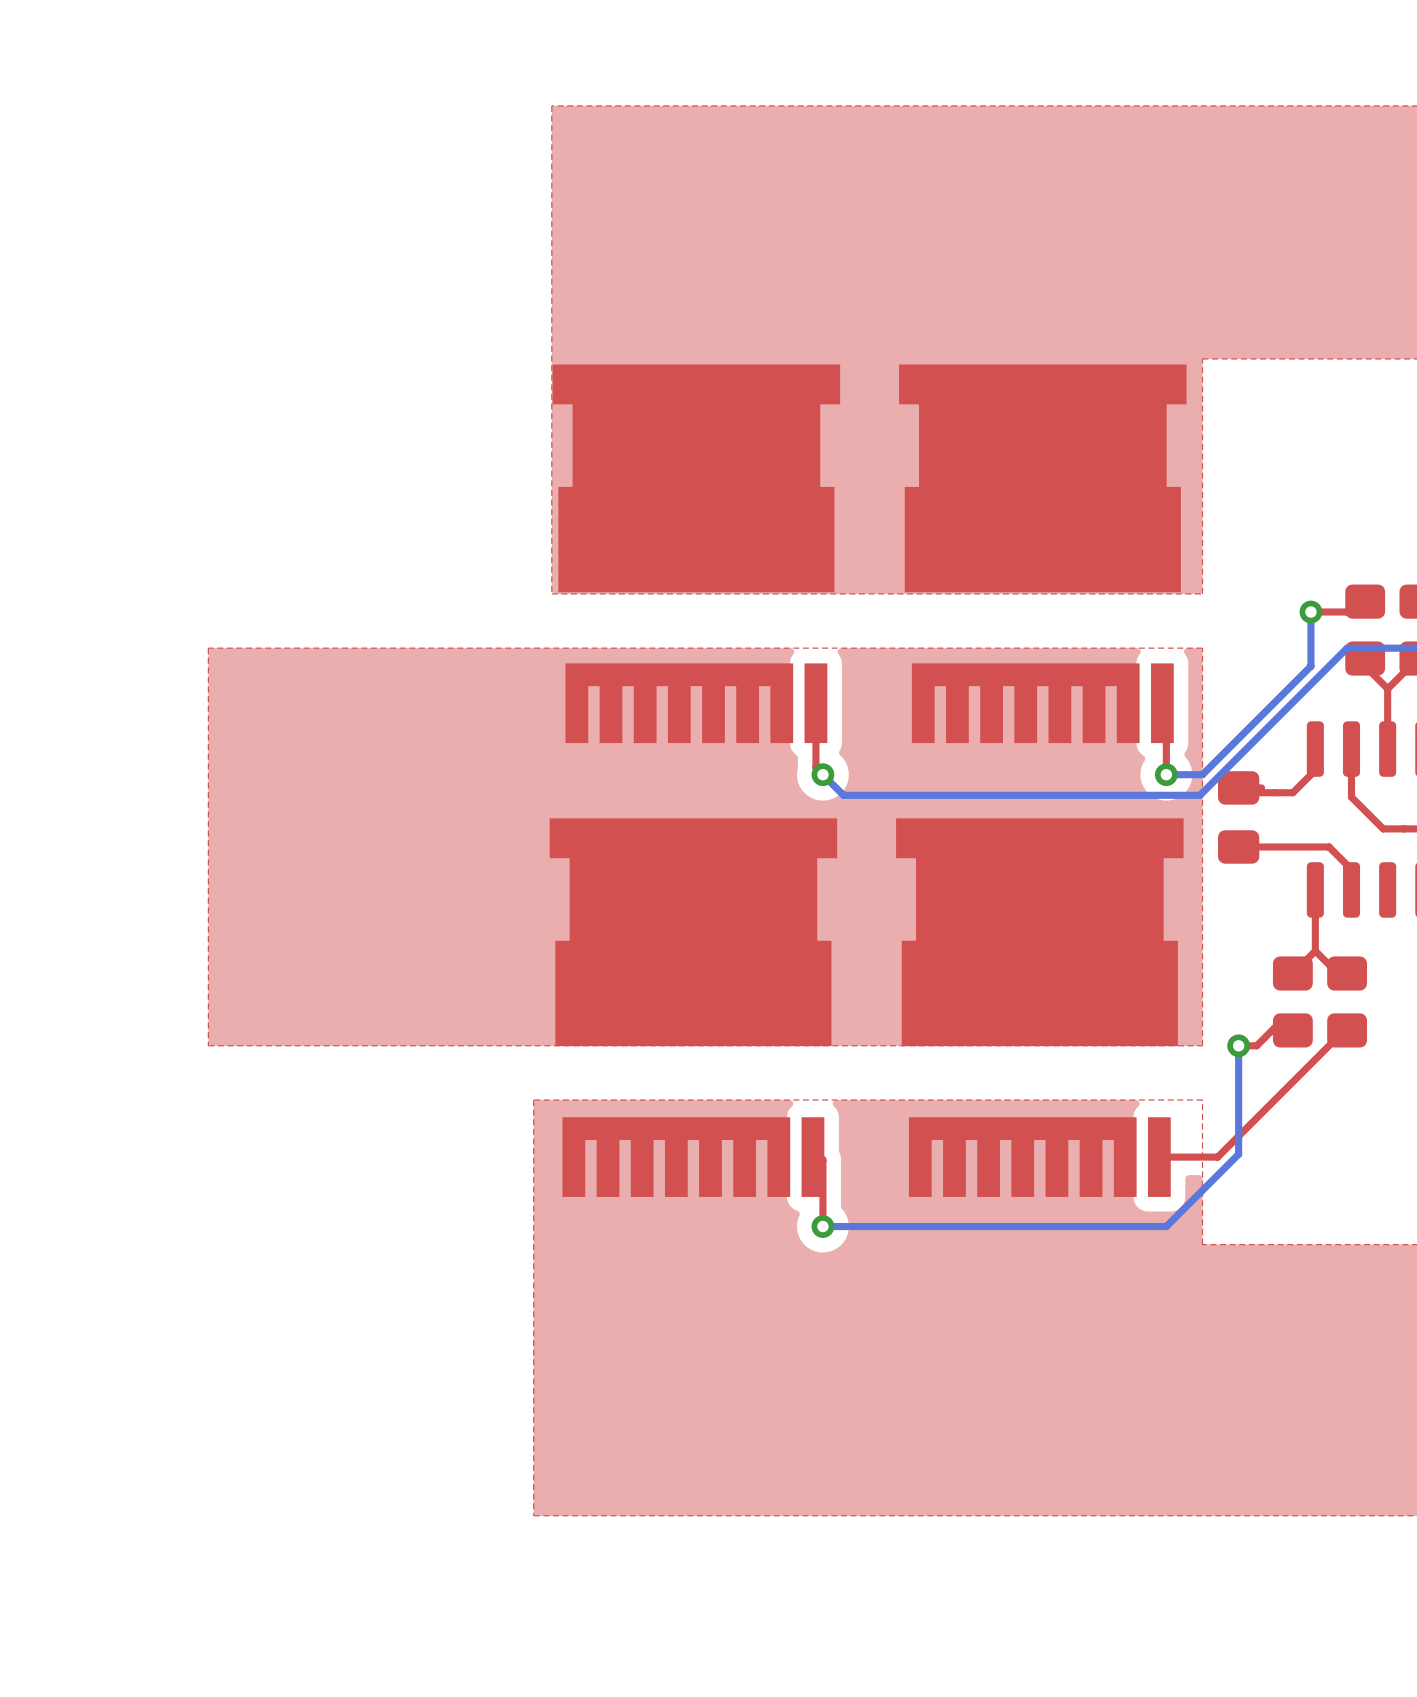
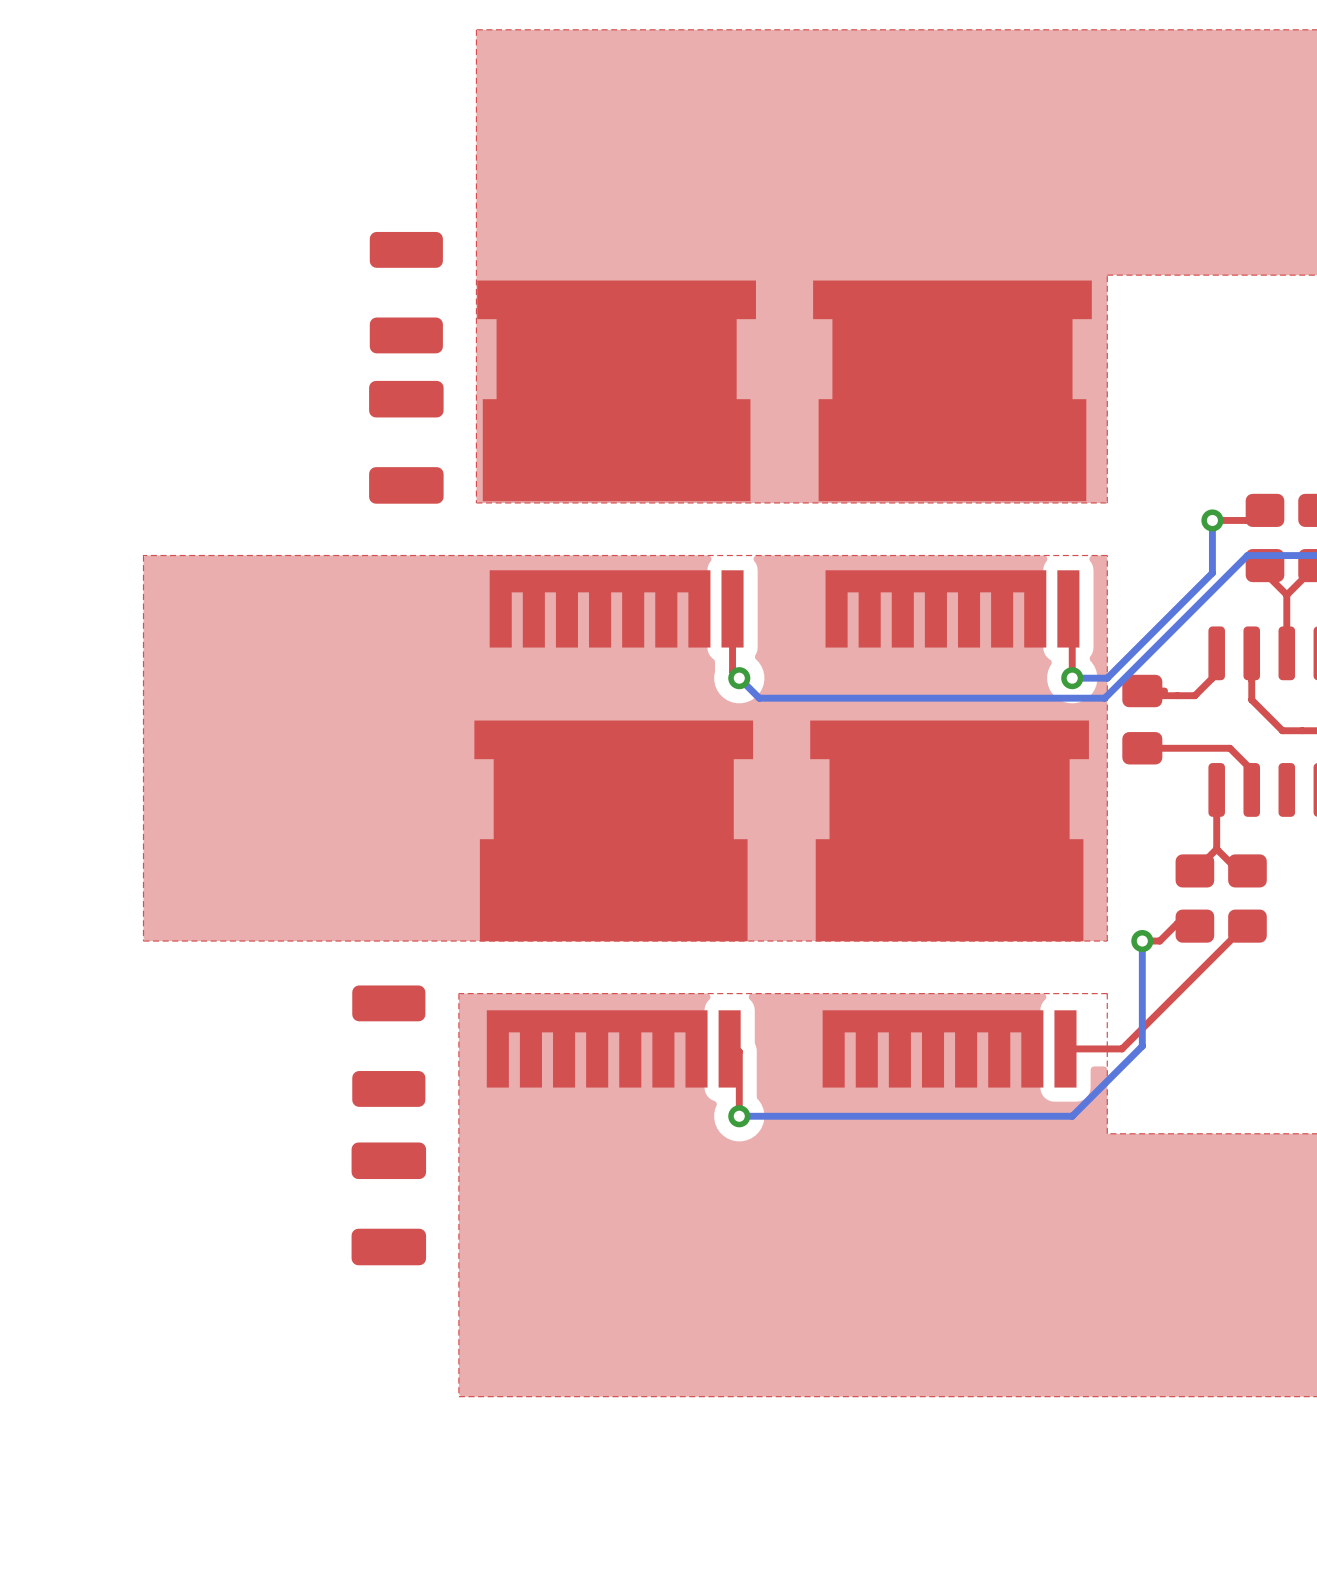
part: none -> (406, 292)
part: none -> (406, 442)
part: none -> (388, 1046)
part: none -> (388, 1203)

